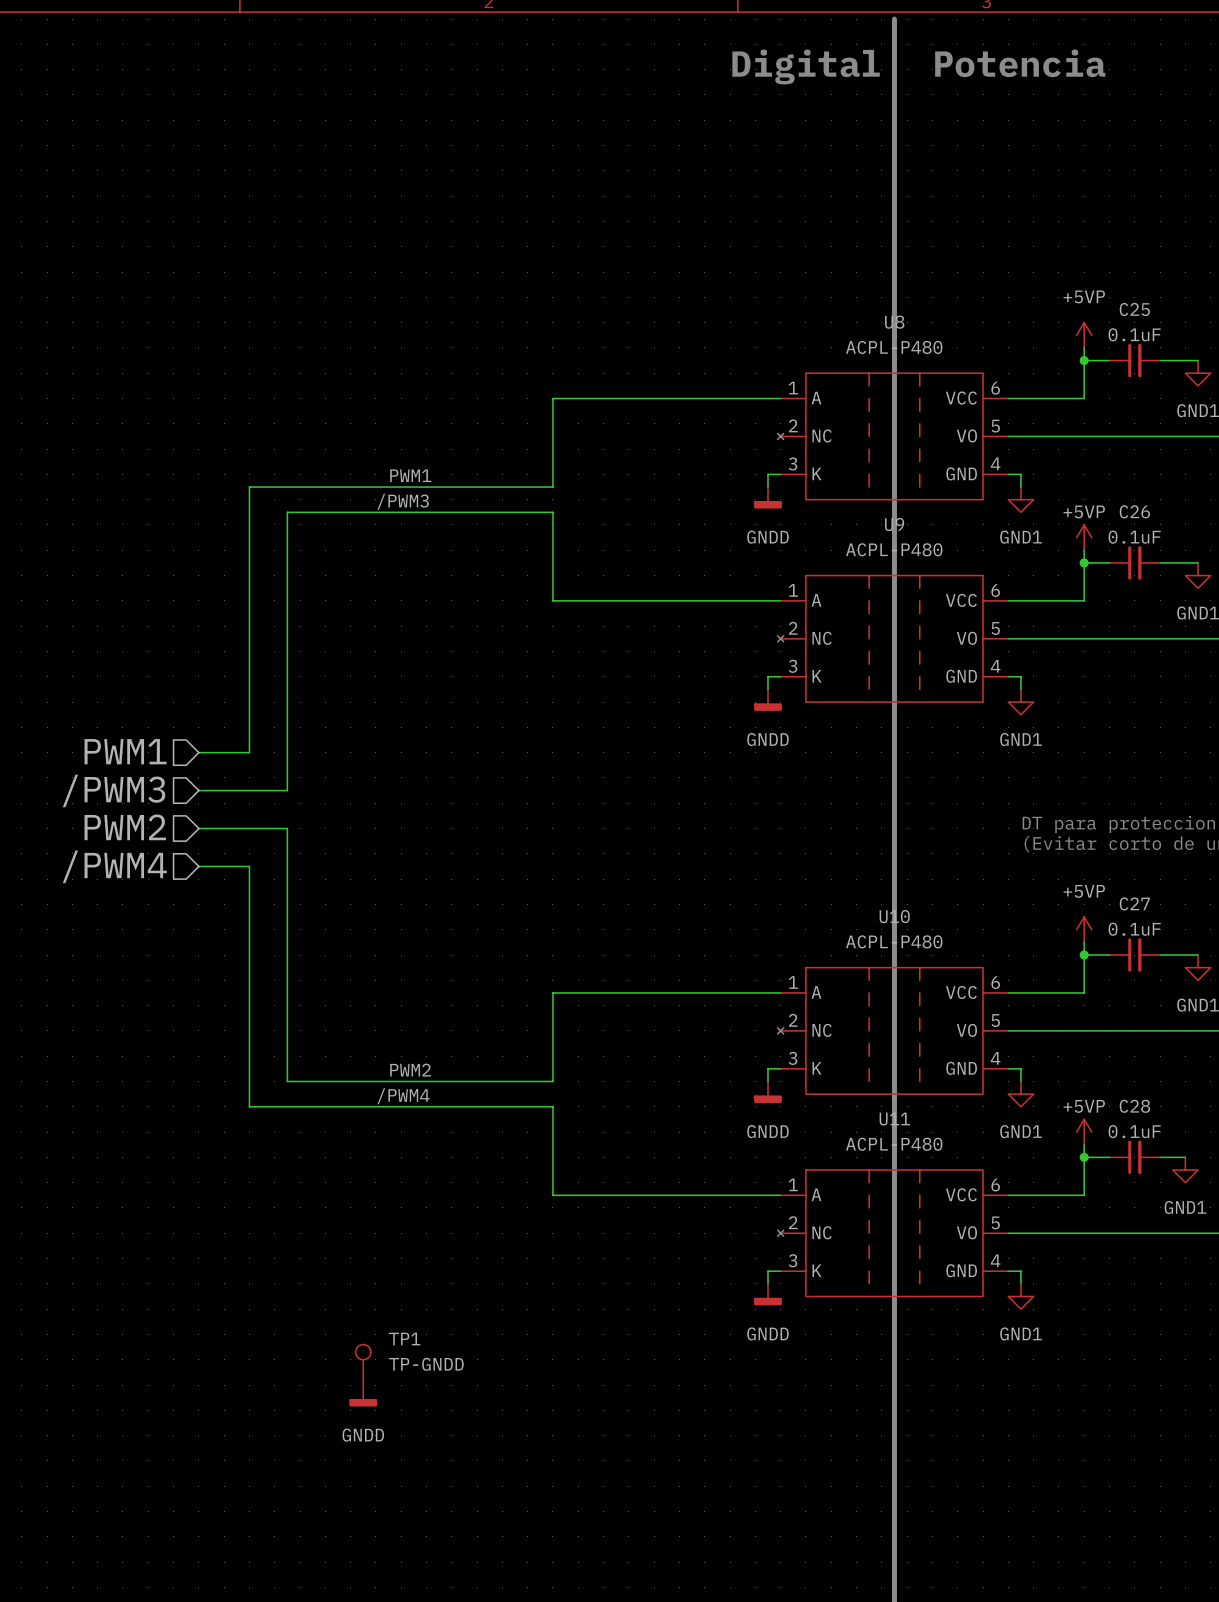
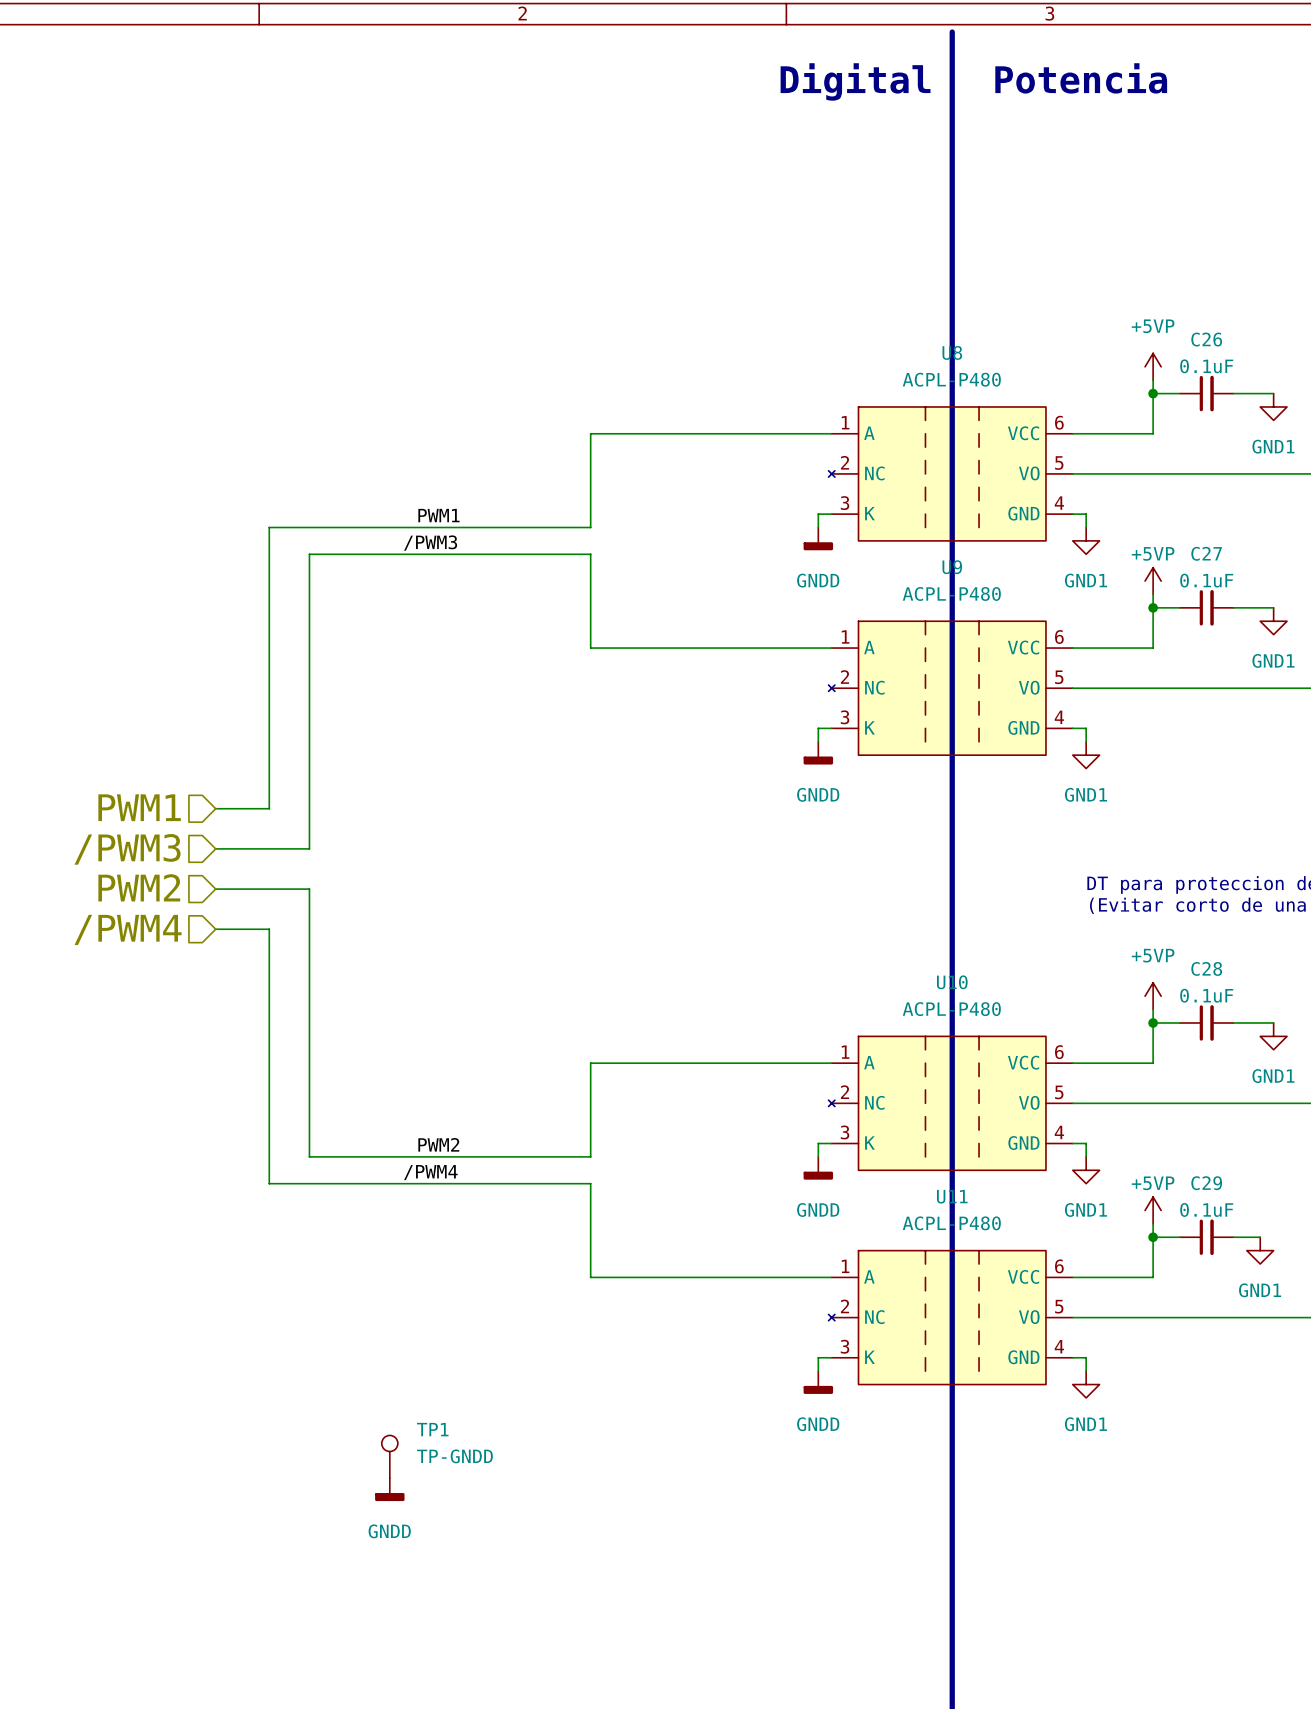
C25 name: C25 (1134, 309) -> C26 (1206, 339)
C26 name: C26 (1134, 511) -> C27 (1206, 553)
C27 name: C27 (1134, 903) -> C28 (1206, 968)
C28 name: C28 (1134, 1106) -> C29 (1206, 1183)

